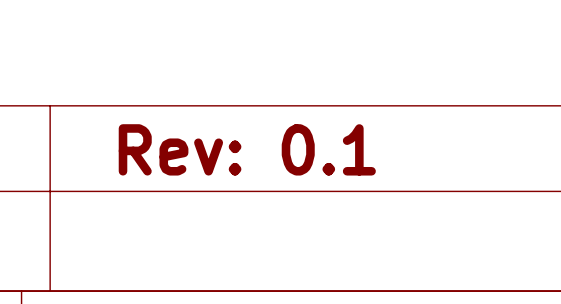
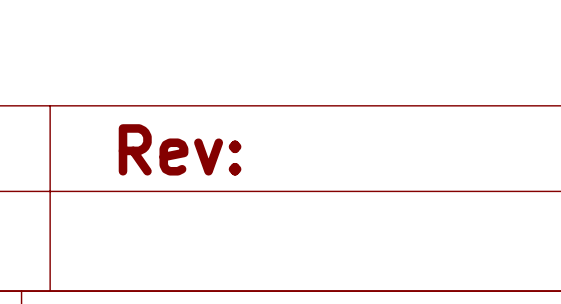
title block: Rev: 0.1 (247, 149) -> Rev: (180, 149)

